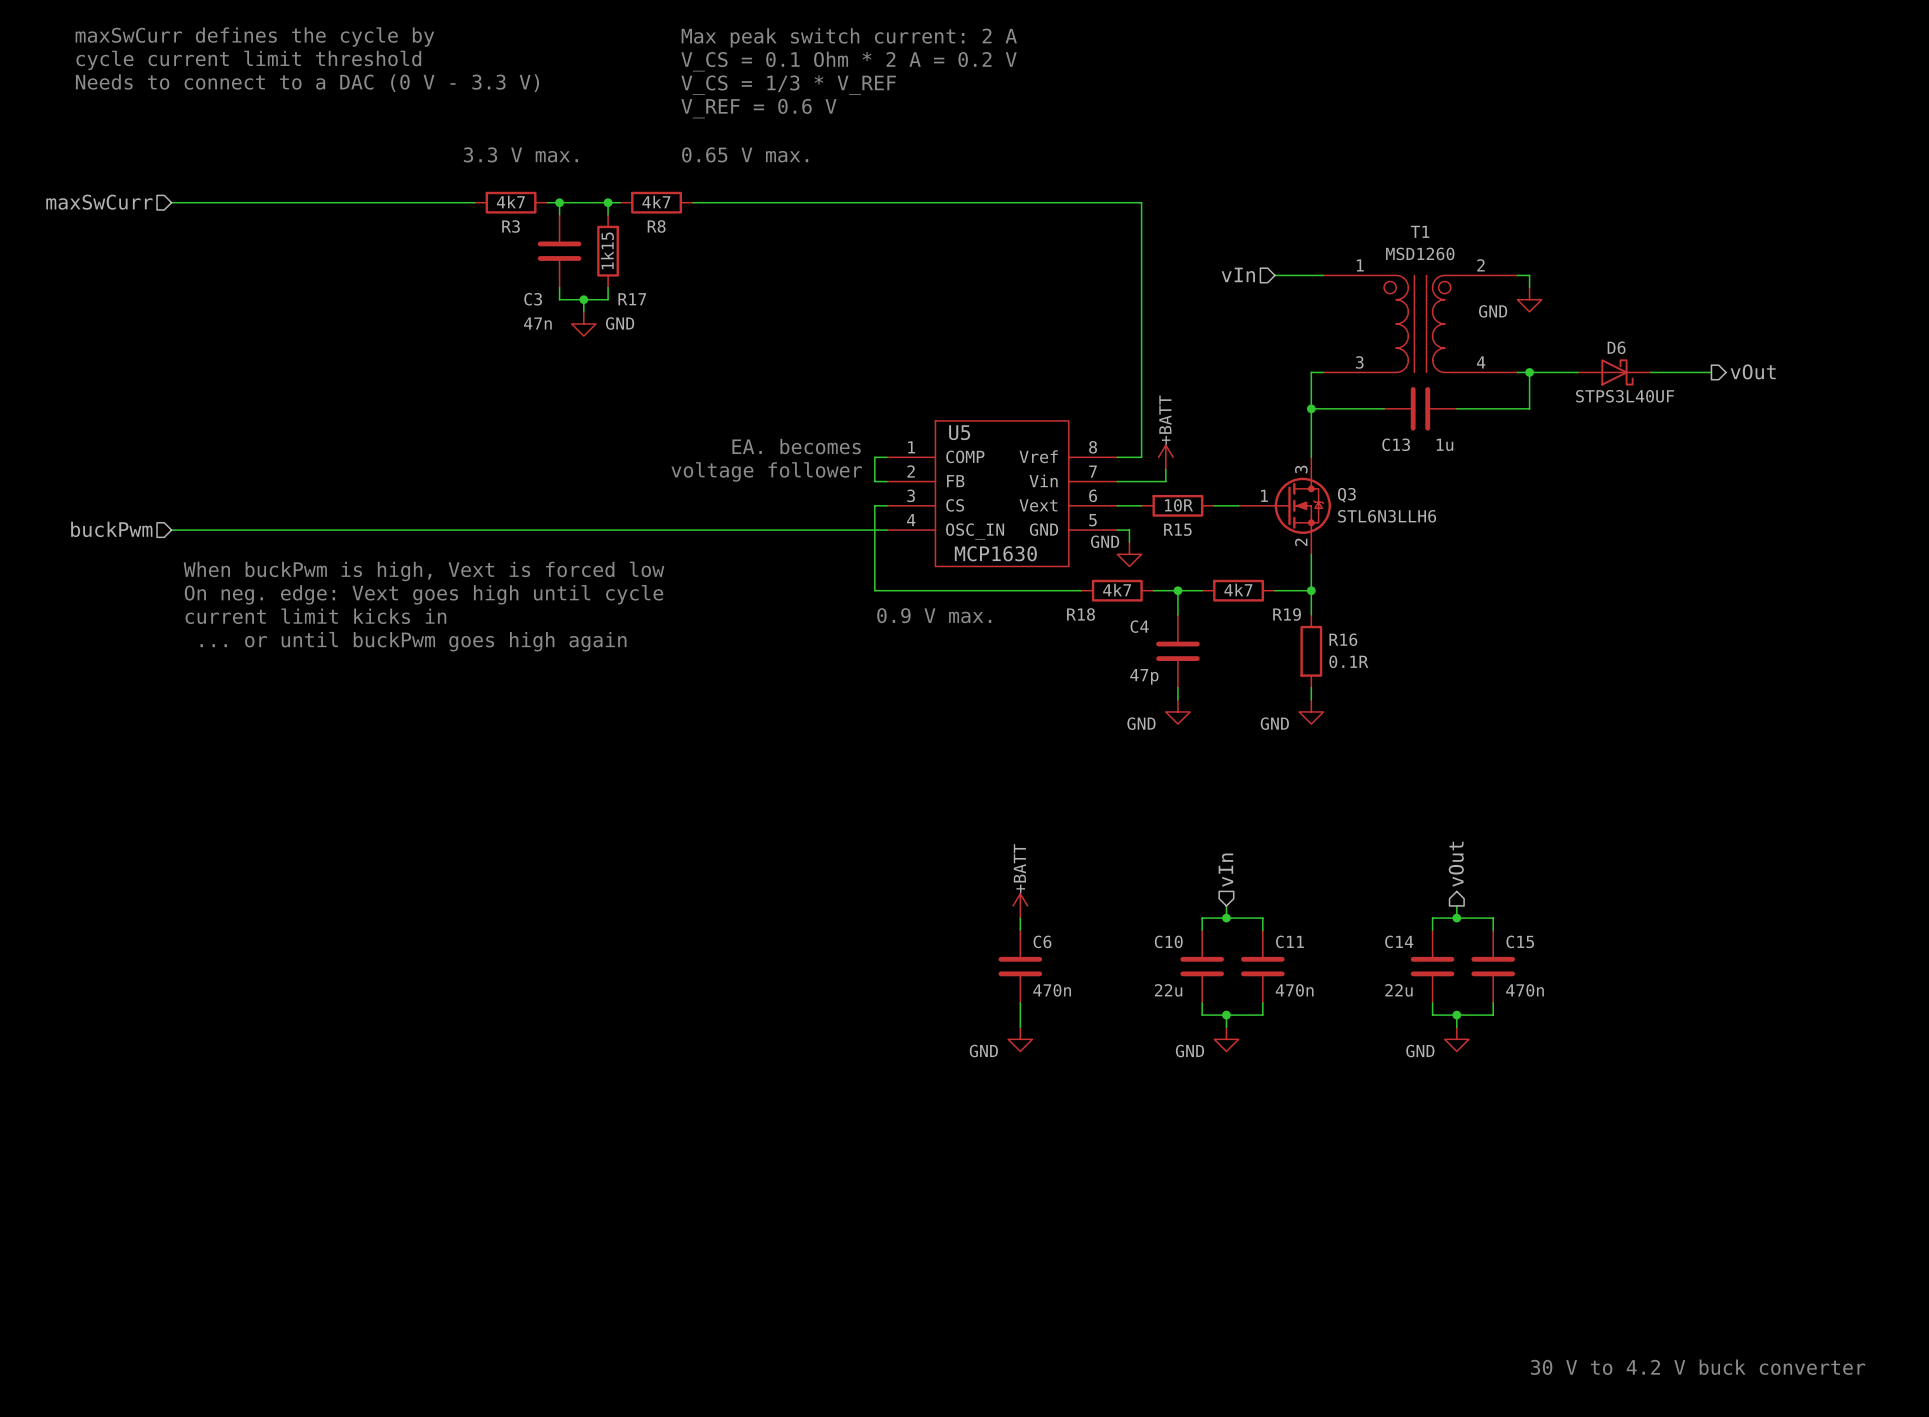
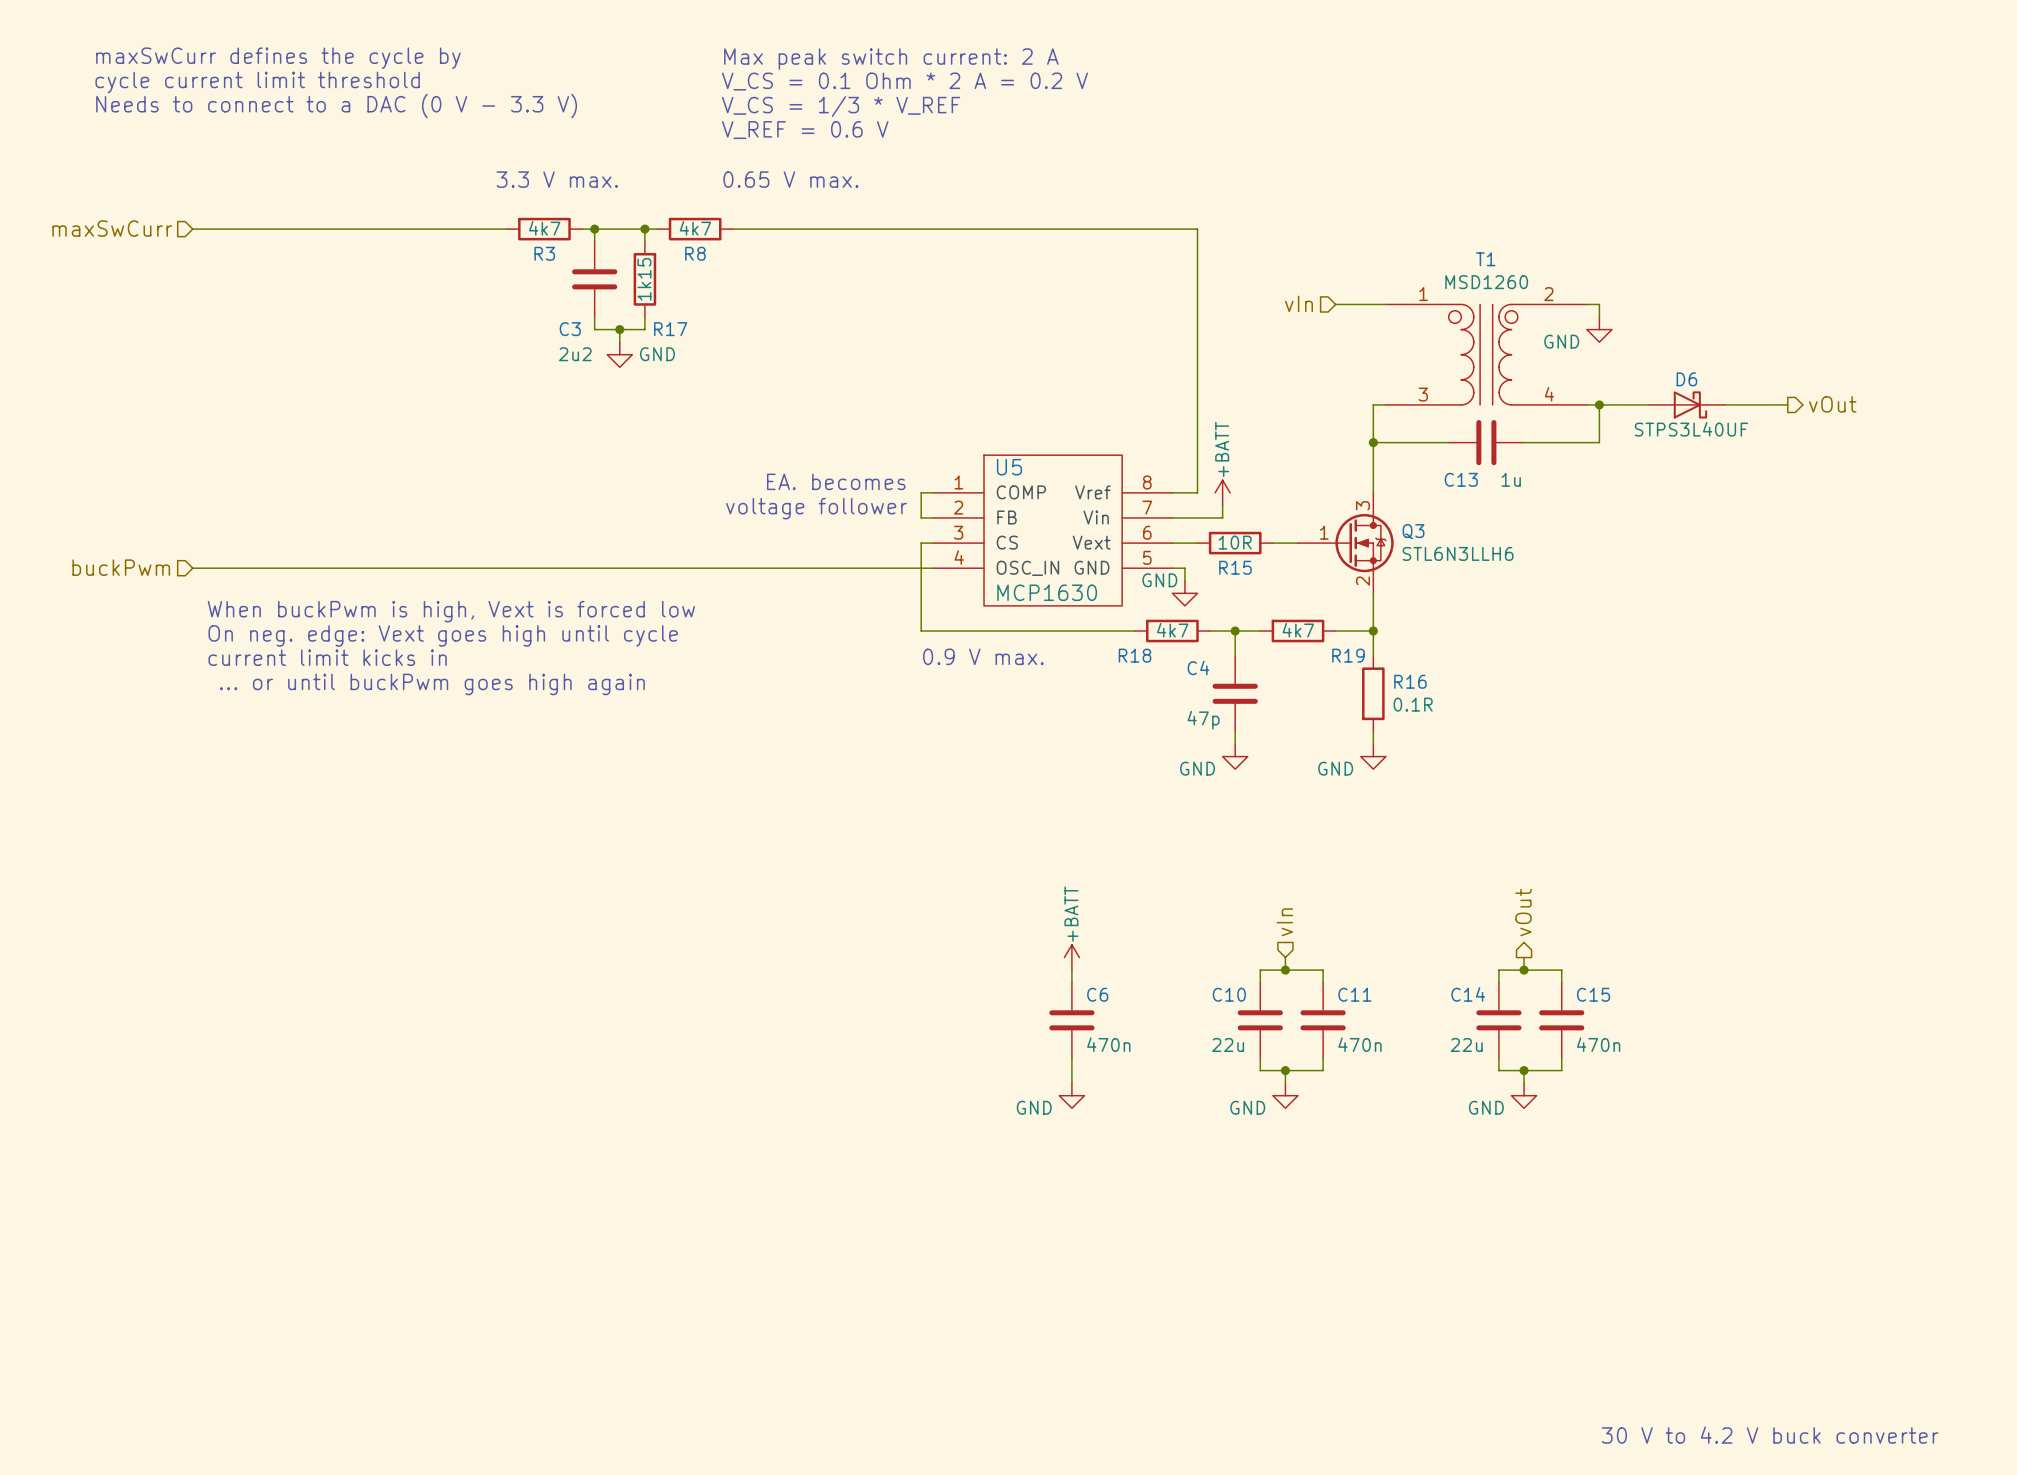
C3 value: 47n (537, 323) -> 2u2 (575, 354)

